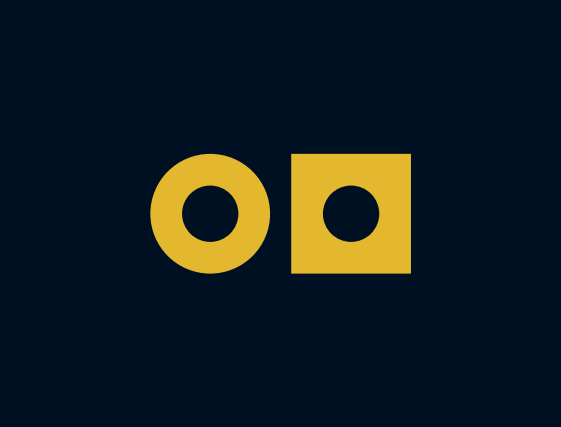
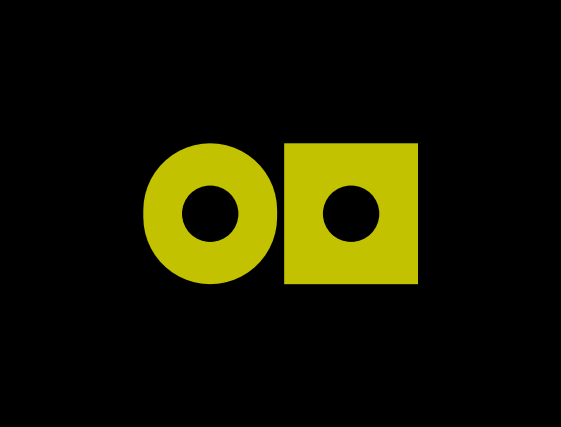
part footprint: [150, 153, 411, 274] -> [143, 143, 419, 285]

